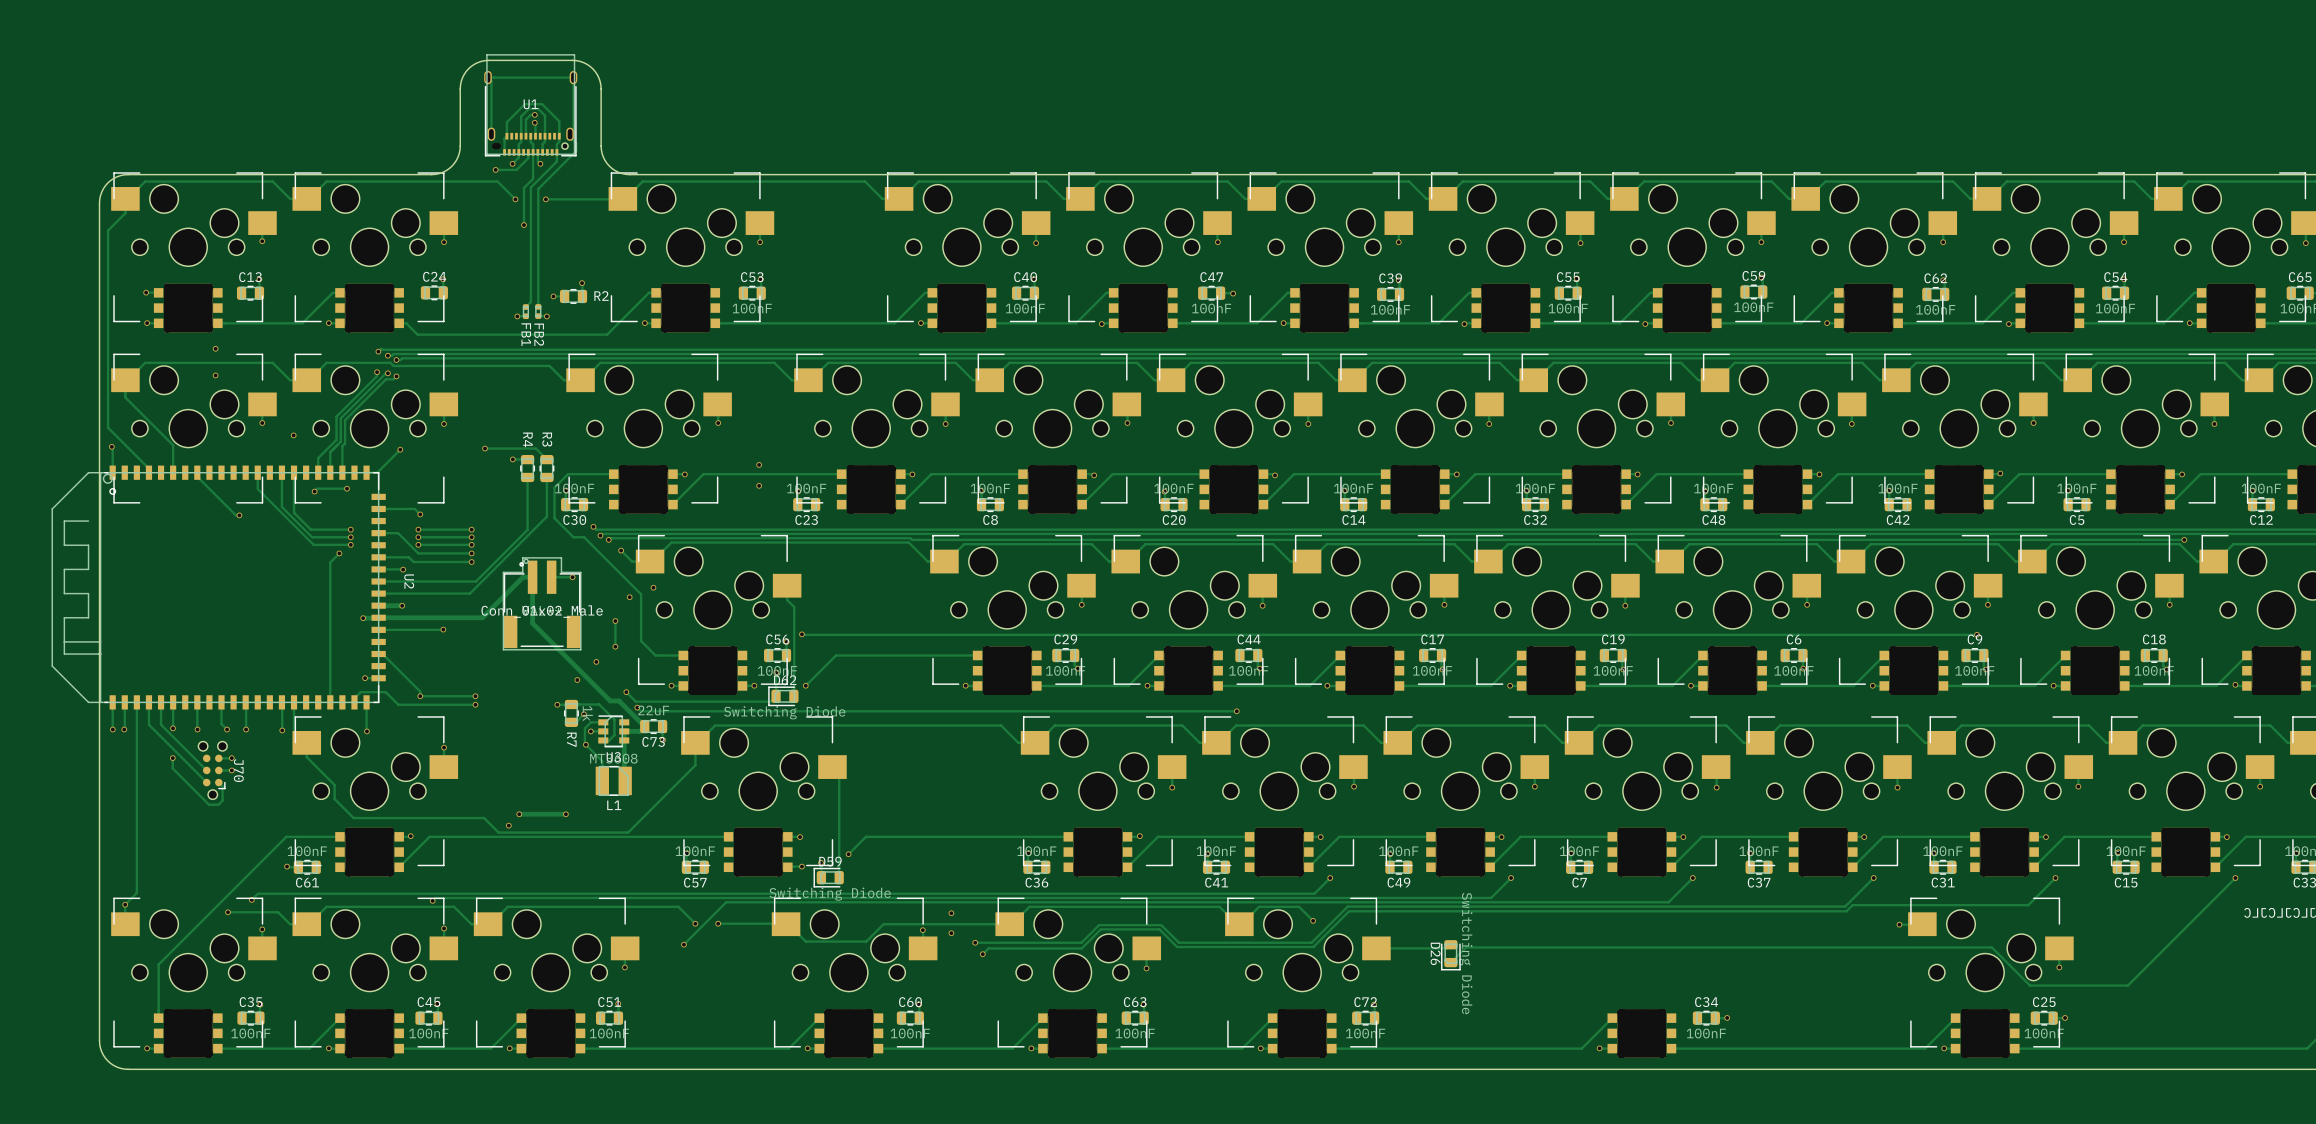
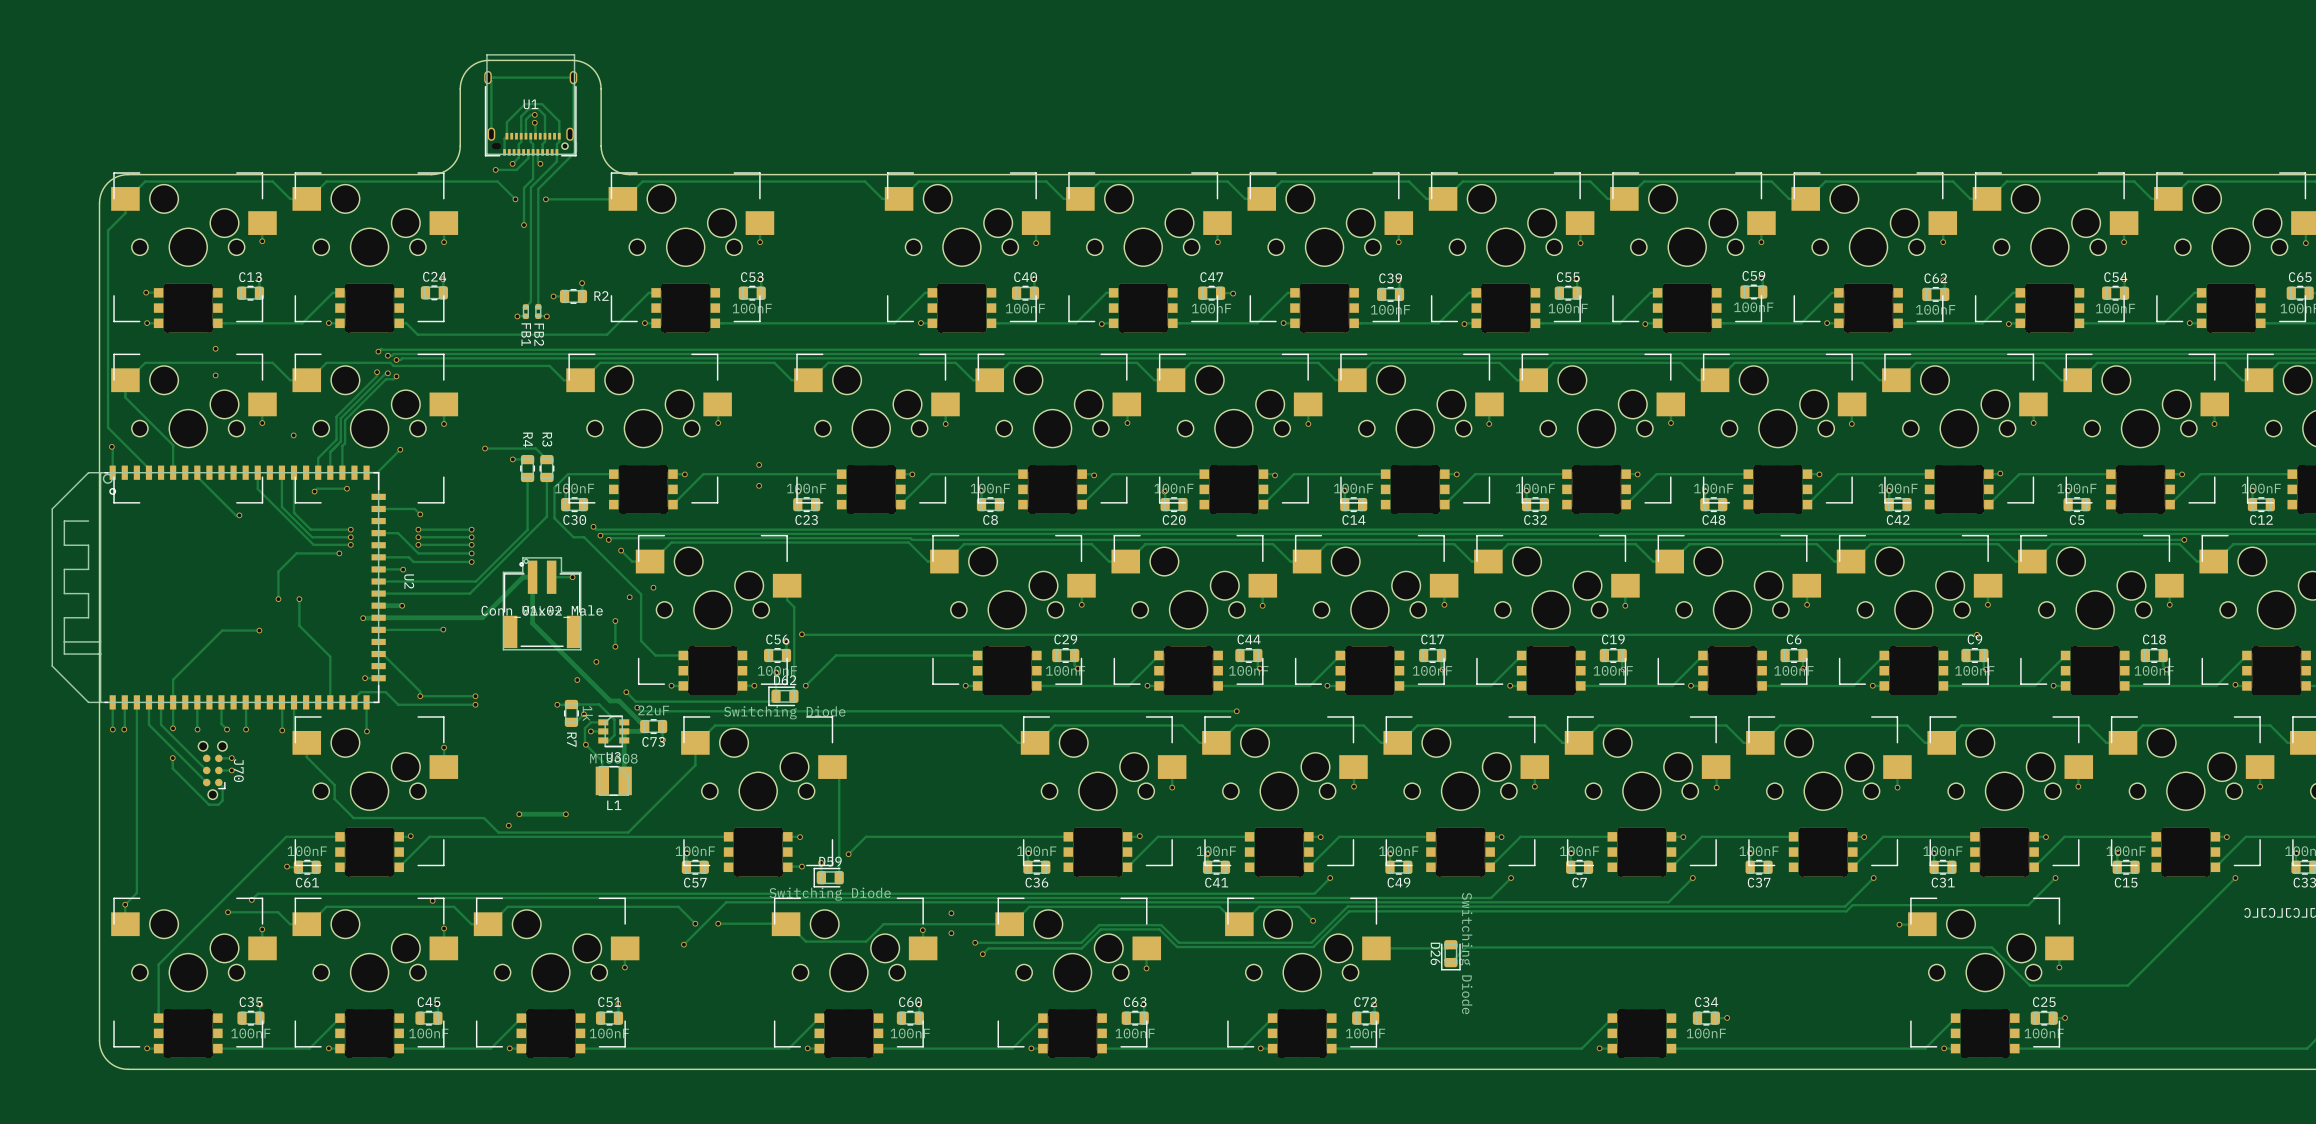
track: (339, 553) (330, 562) (330, 656) -> (299, 599) (299, 625) (330, 656)
track: none -> (339, 553) (296, 553) (278, 571) (278, 599)
via: none -> (278, 599)
via: none -> (299, 599)
track: none -> (259, 630) (222, 630) (173, 679) (173, 702)
via: none -> (259, 630)

